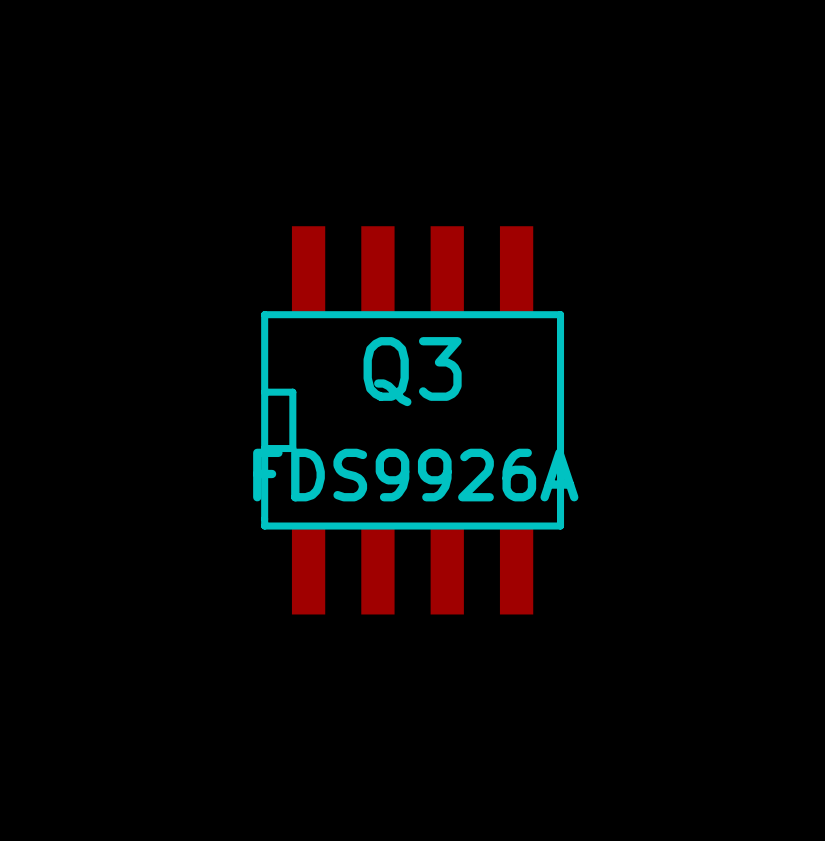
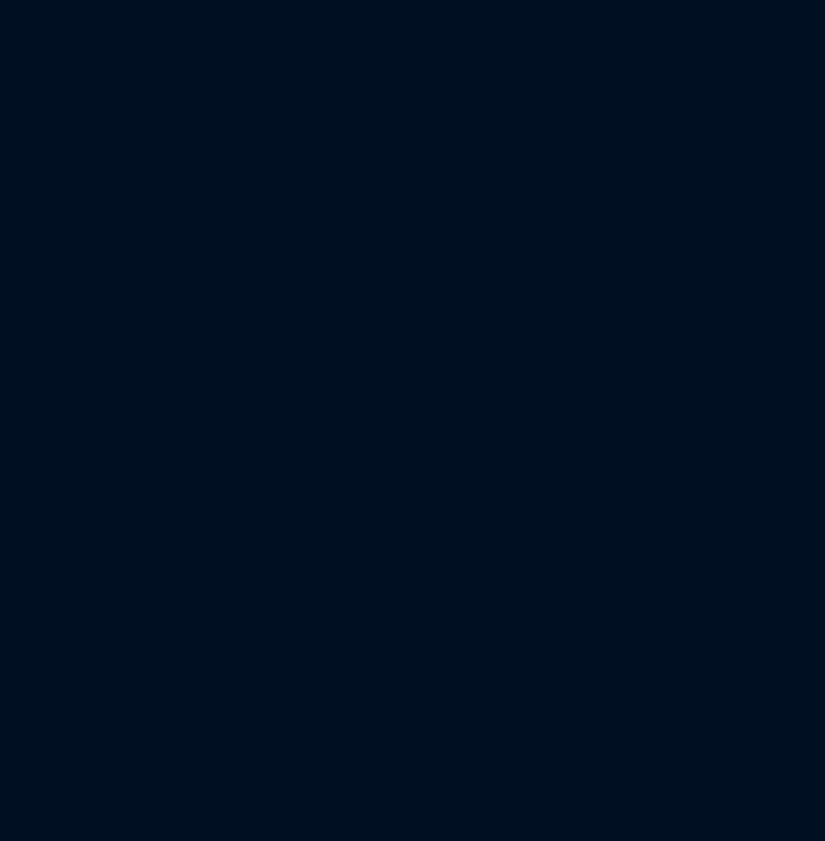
Q3: FDS9926A (412, 420) -> none

